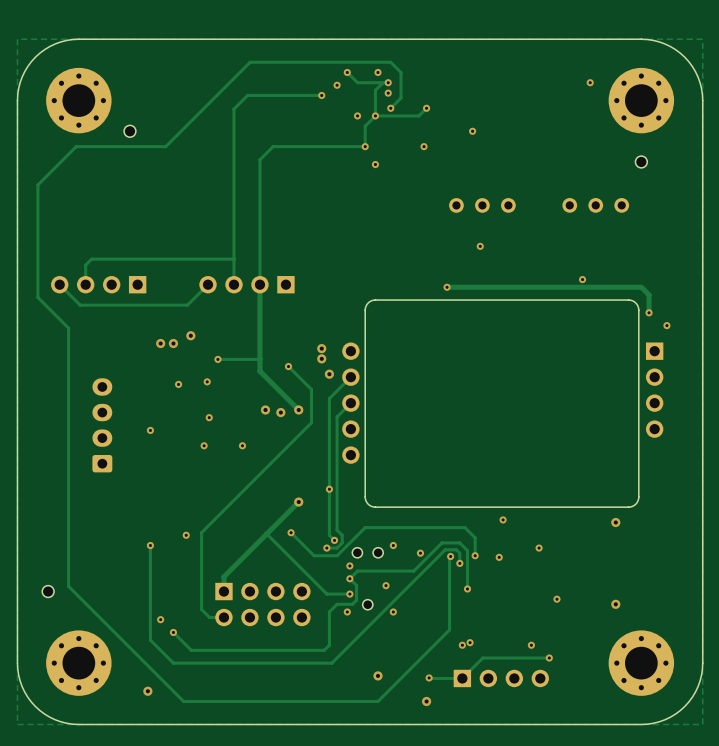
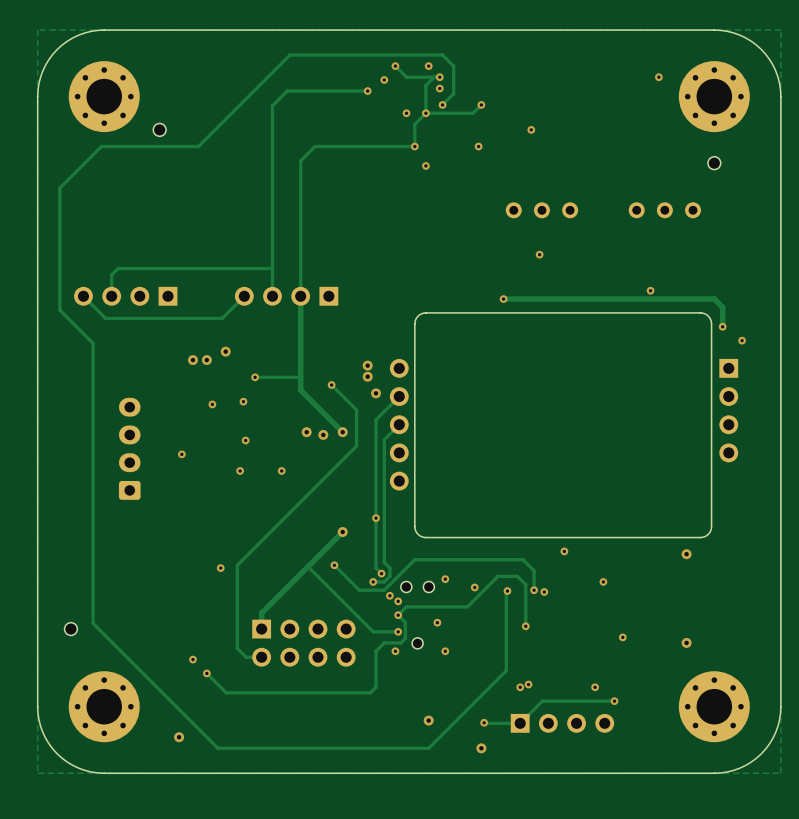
track: (150, 545) (150, 640) (173, 663) (331, 663) (445, 549) (456, 549) (459, 553) (459, 563) -> none
via: (150, 545) -> none
via: none -> (544, 592)
via: (499, 557) -> none
via: none -> (389, 595)
via: (459, 563) -> none

